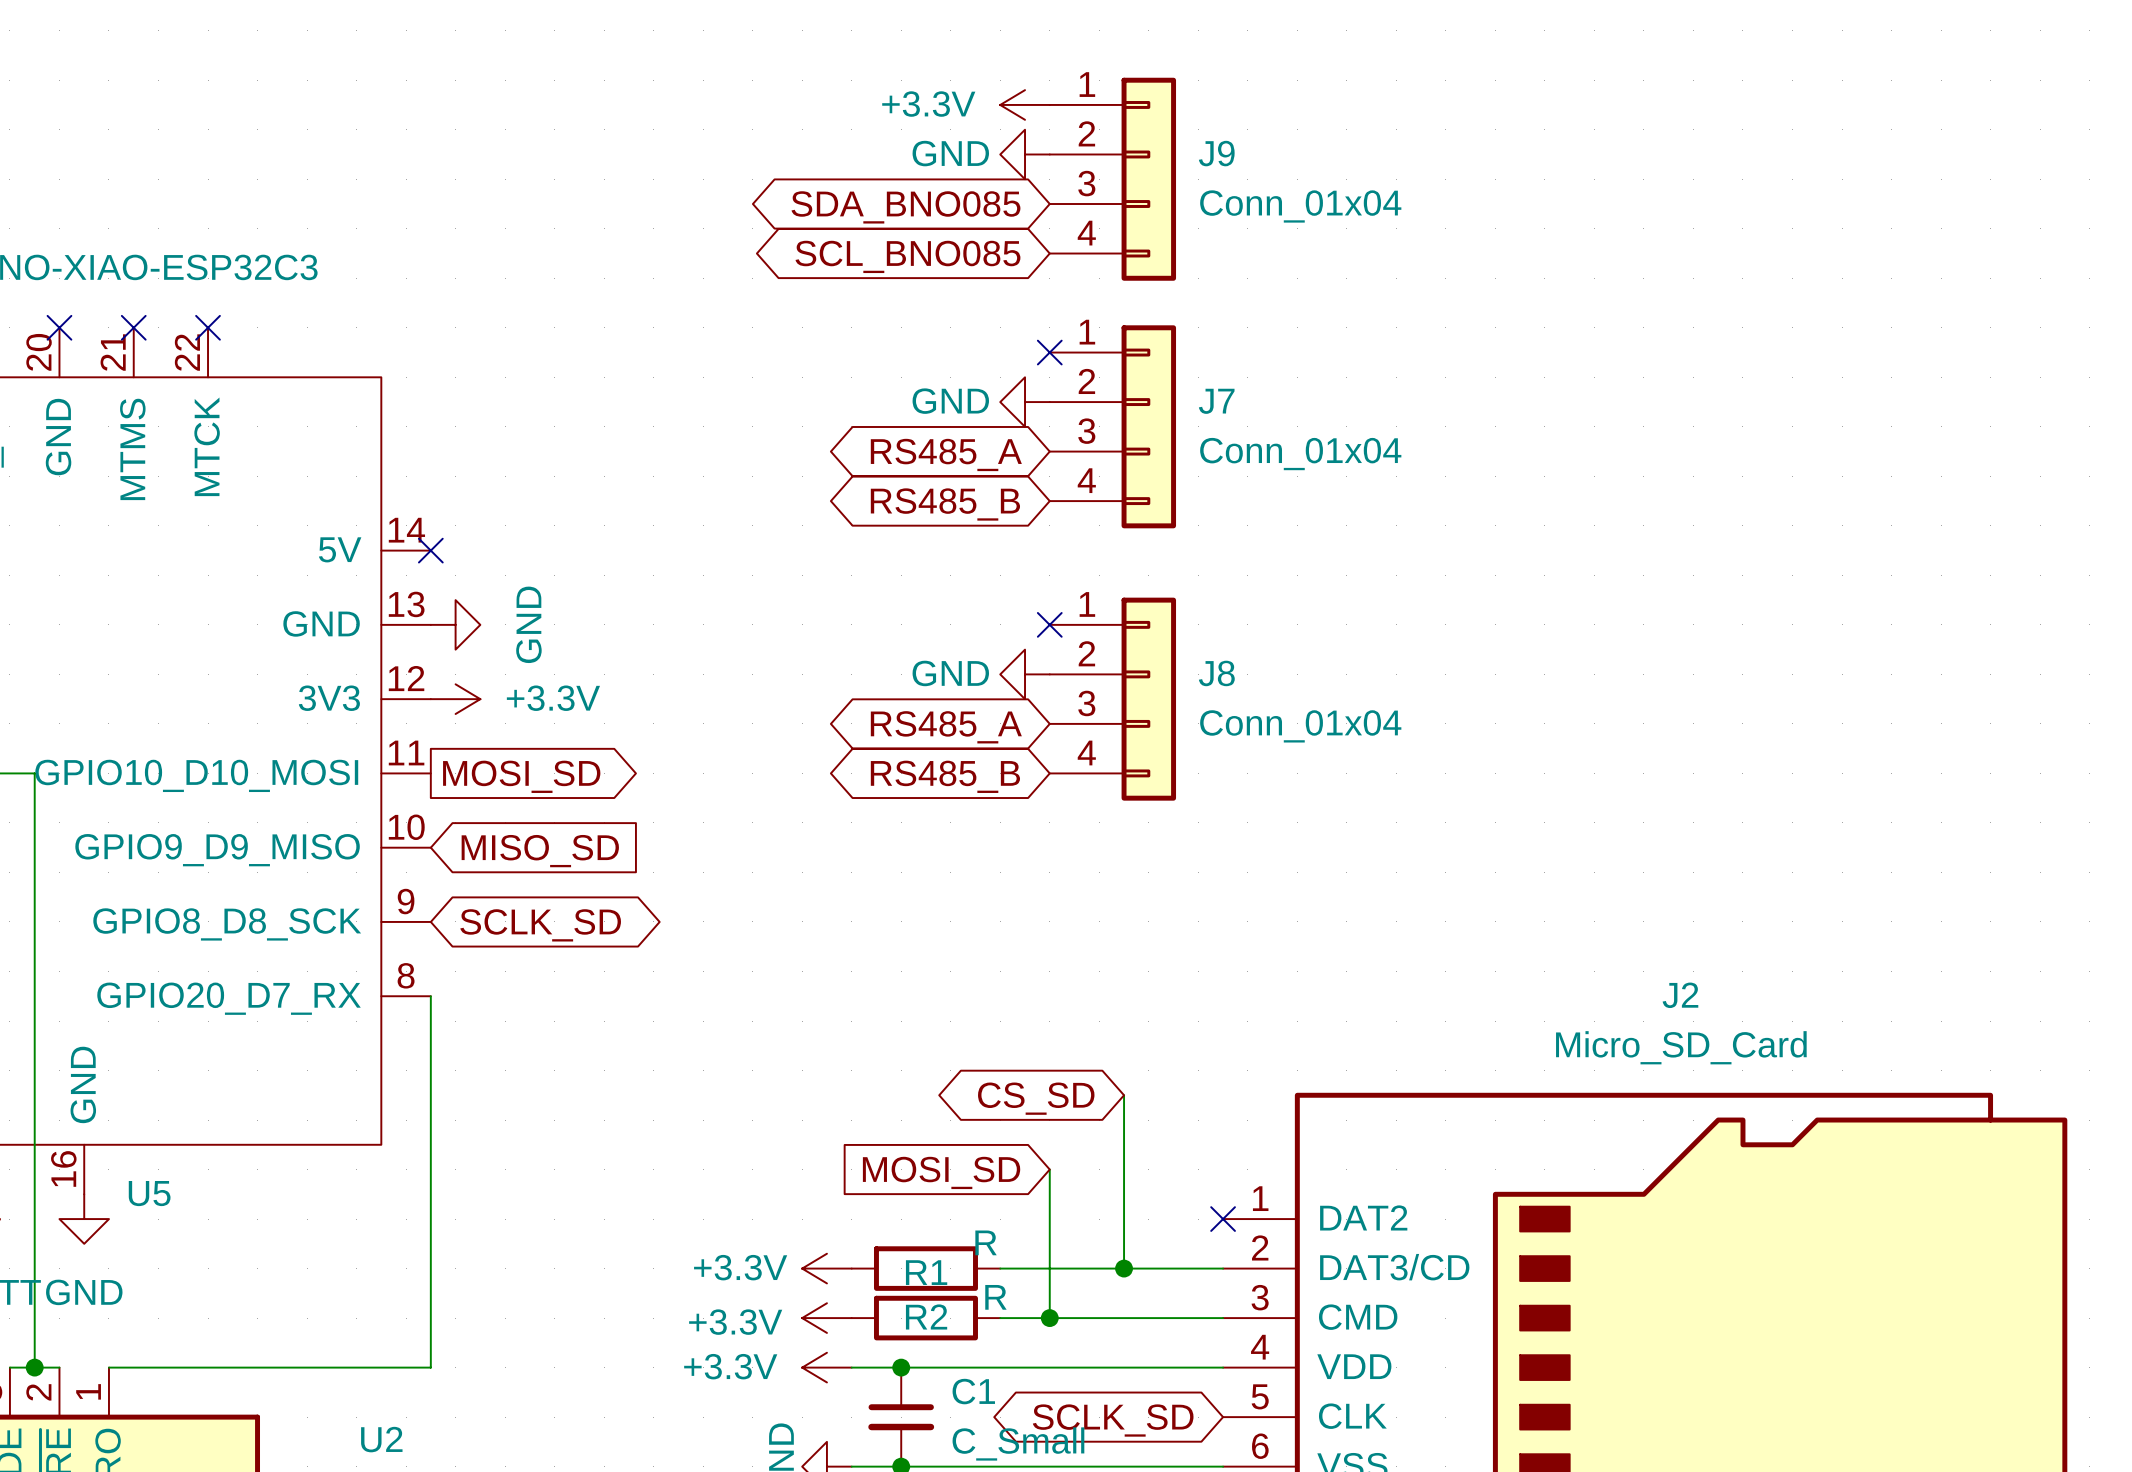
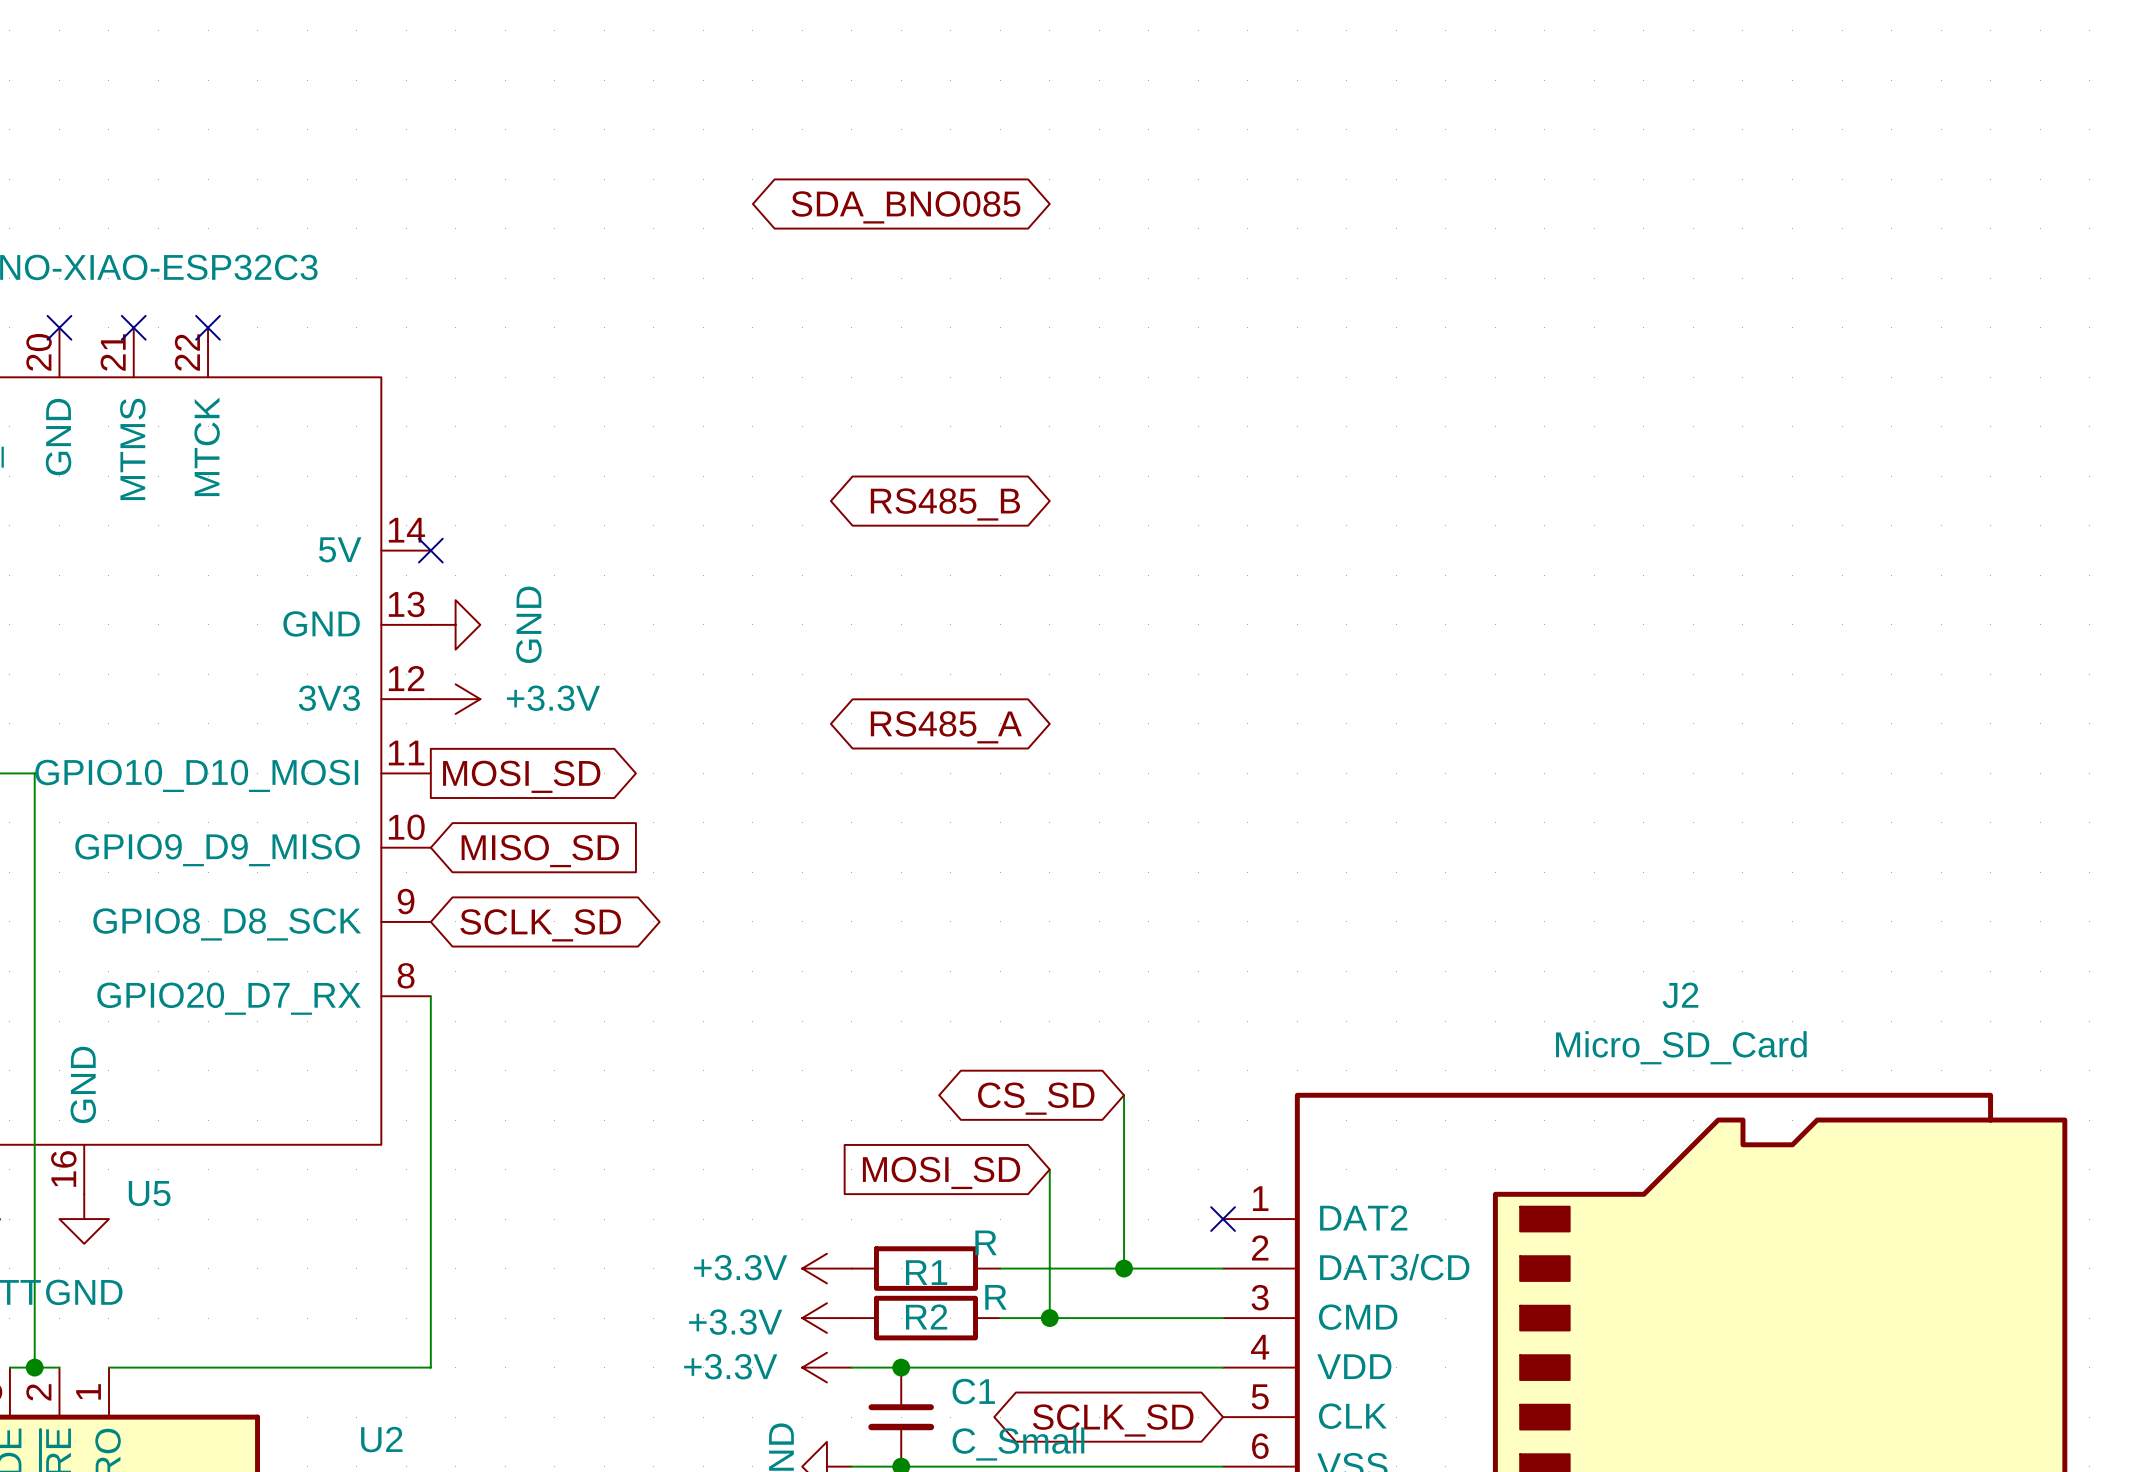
power symbol: +3.3V (1025, 104) -> none
power symbol: GND (1025, 154) -> none
J9: Conn_01x04 (1112, 179) -> none
global label: SCL_BNO085 (907, 256) -> none
no-connect mark: (1049, 352) -> none
power symbol: GND (1025, 402) -> none
J7: Conn_01x04 (1112, 426) -> none
global label: RS485_A (946, 454) -> none
no-connect mark: (1049, 624) -> none
power symbol: GND (1025, 674) -> none
J8: Conn_01x04 (1112, 699) -> none
global label: RS485_B (945, 776) -> none

